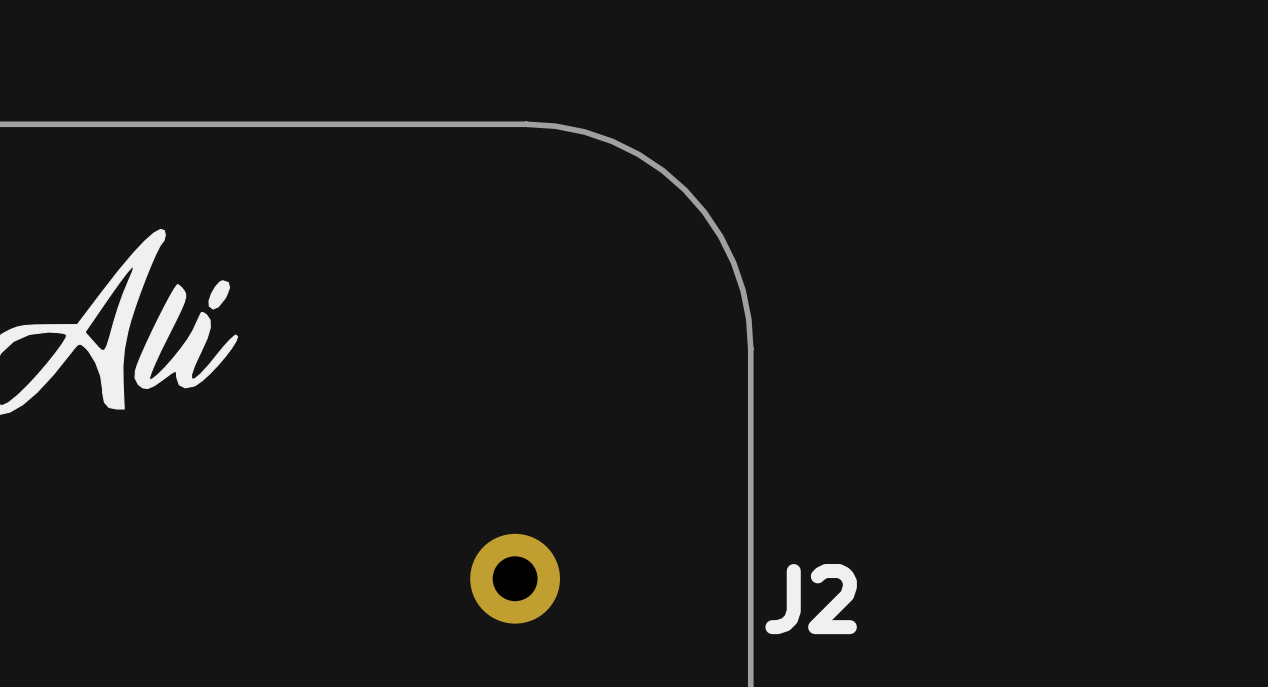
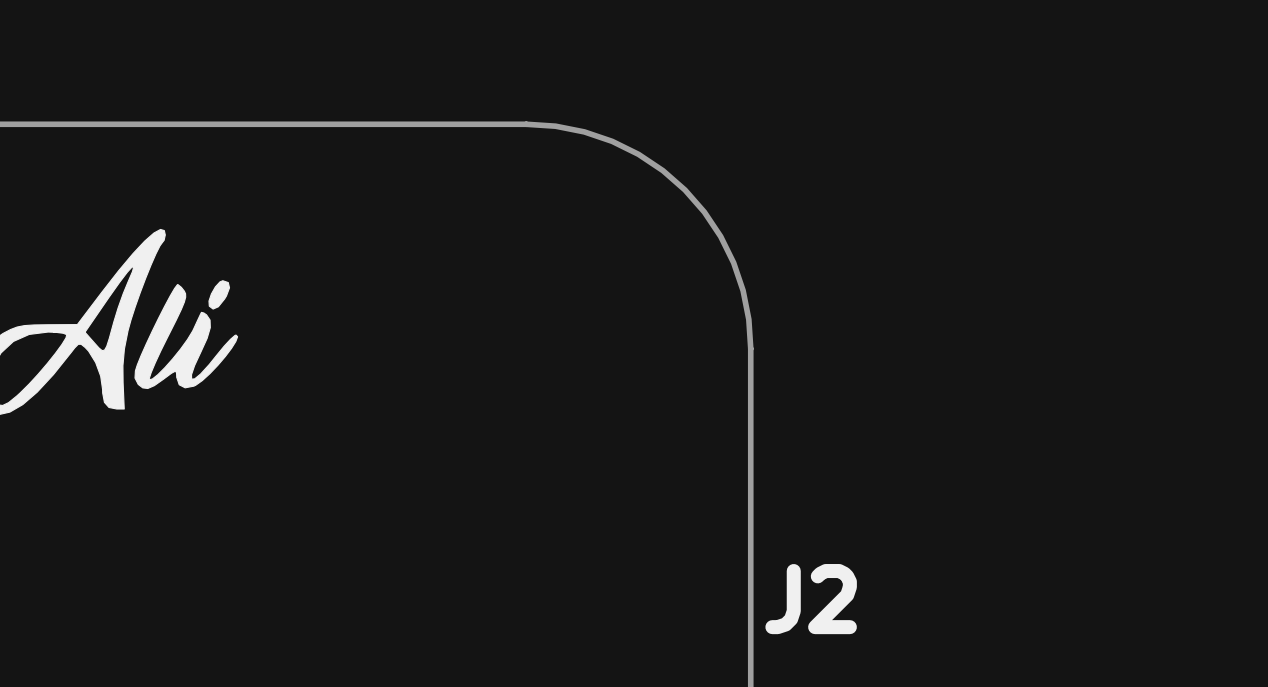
via: (515, 578) -> none

